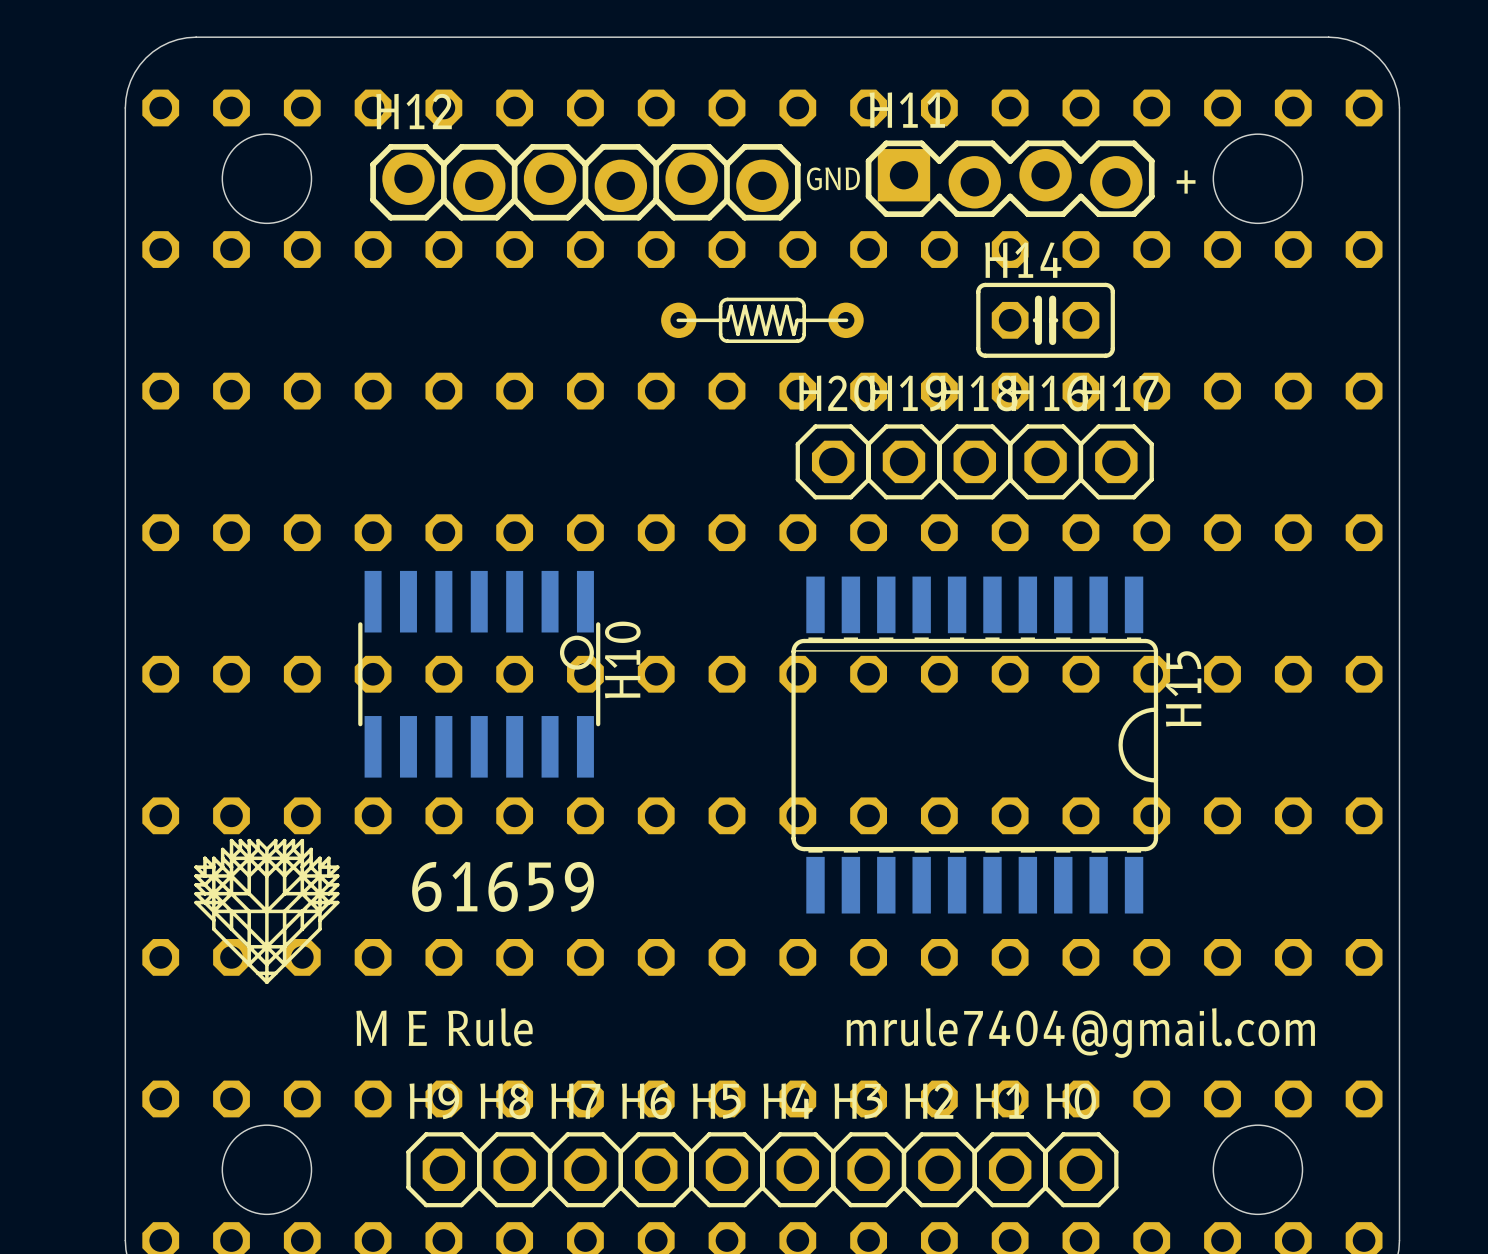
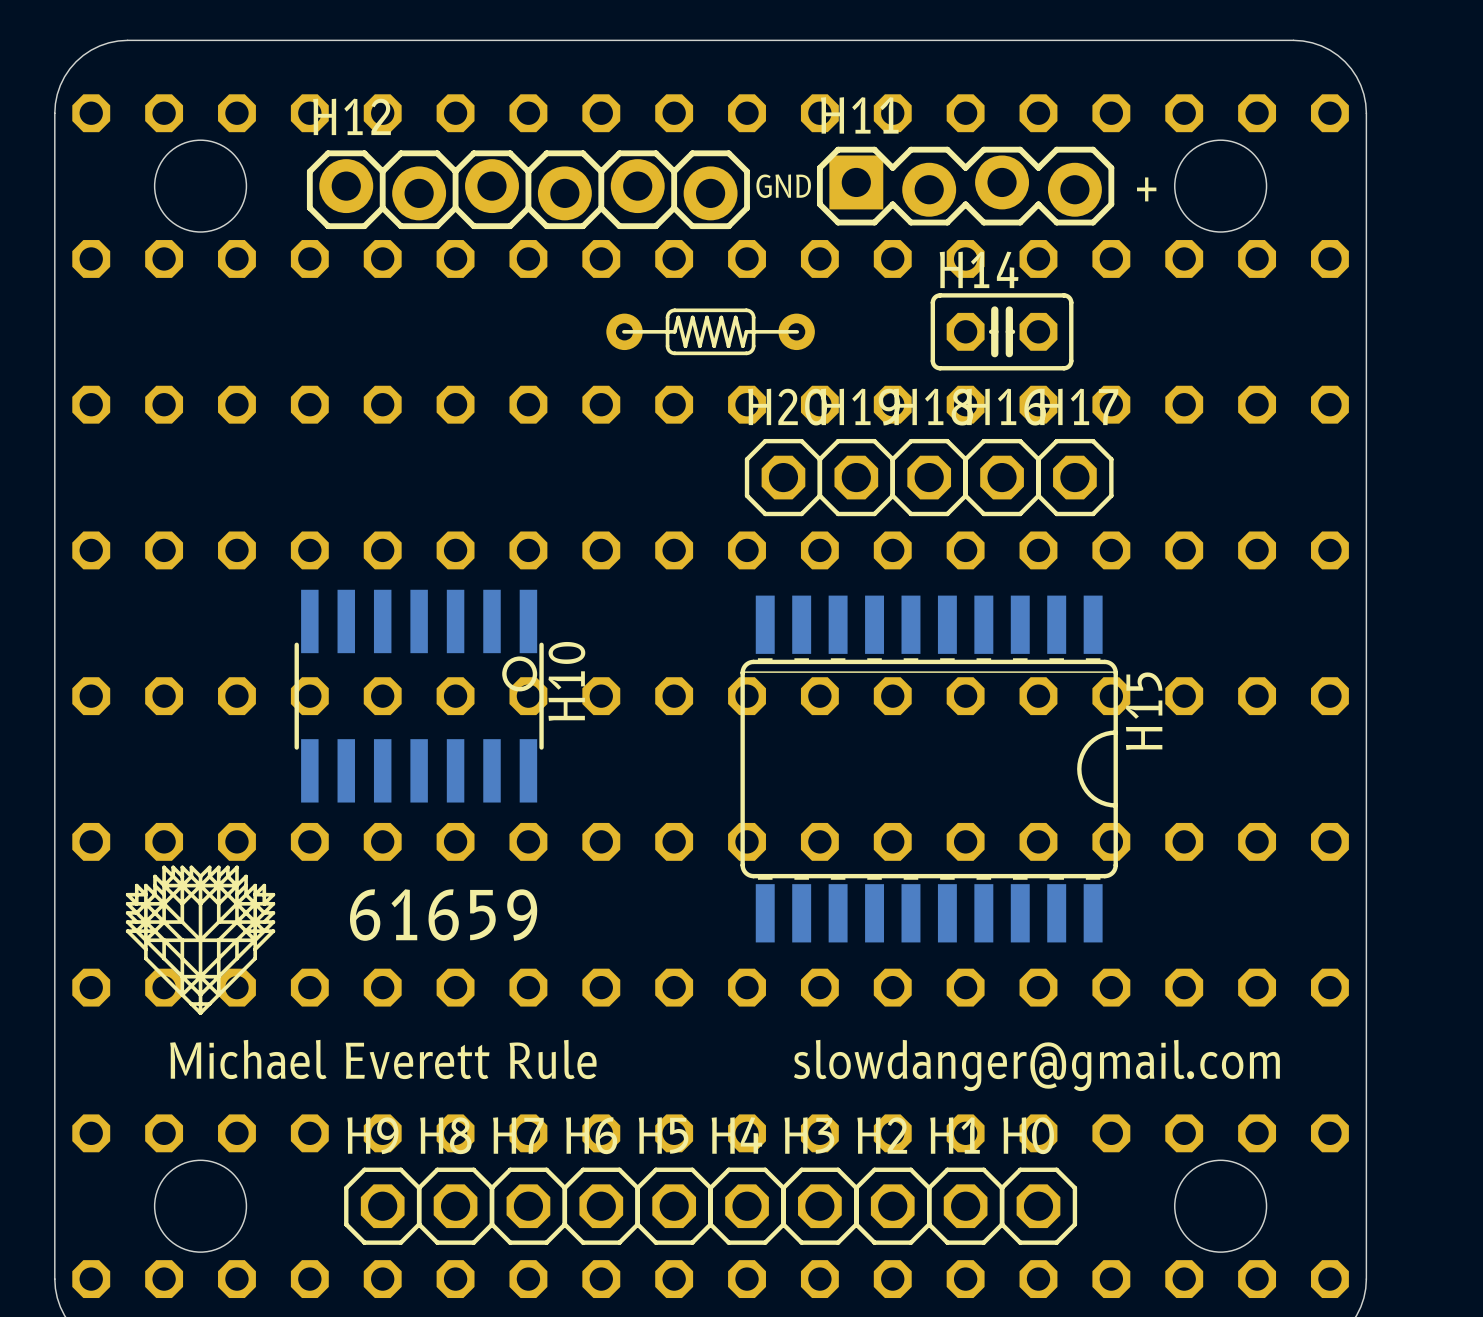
text: M E Rule (444, 1027) -> Michael Everett Rule (383, 1059)
text: mrule7404@gmail.com (1080, 1033) -> slowdanger@gmail.com (1036, 1065)

